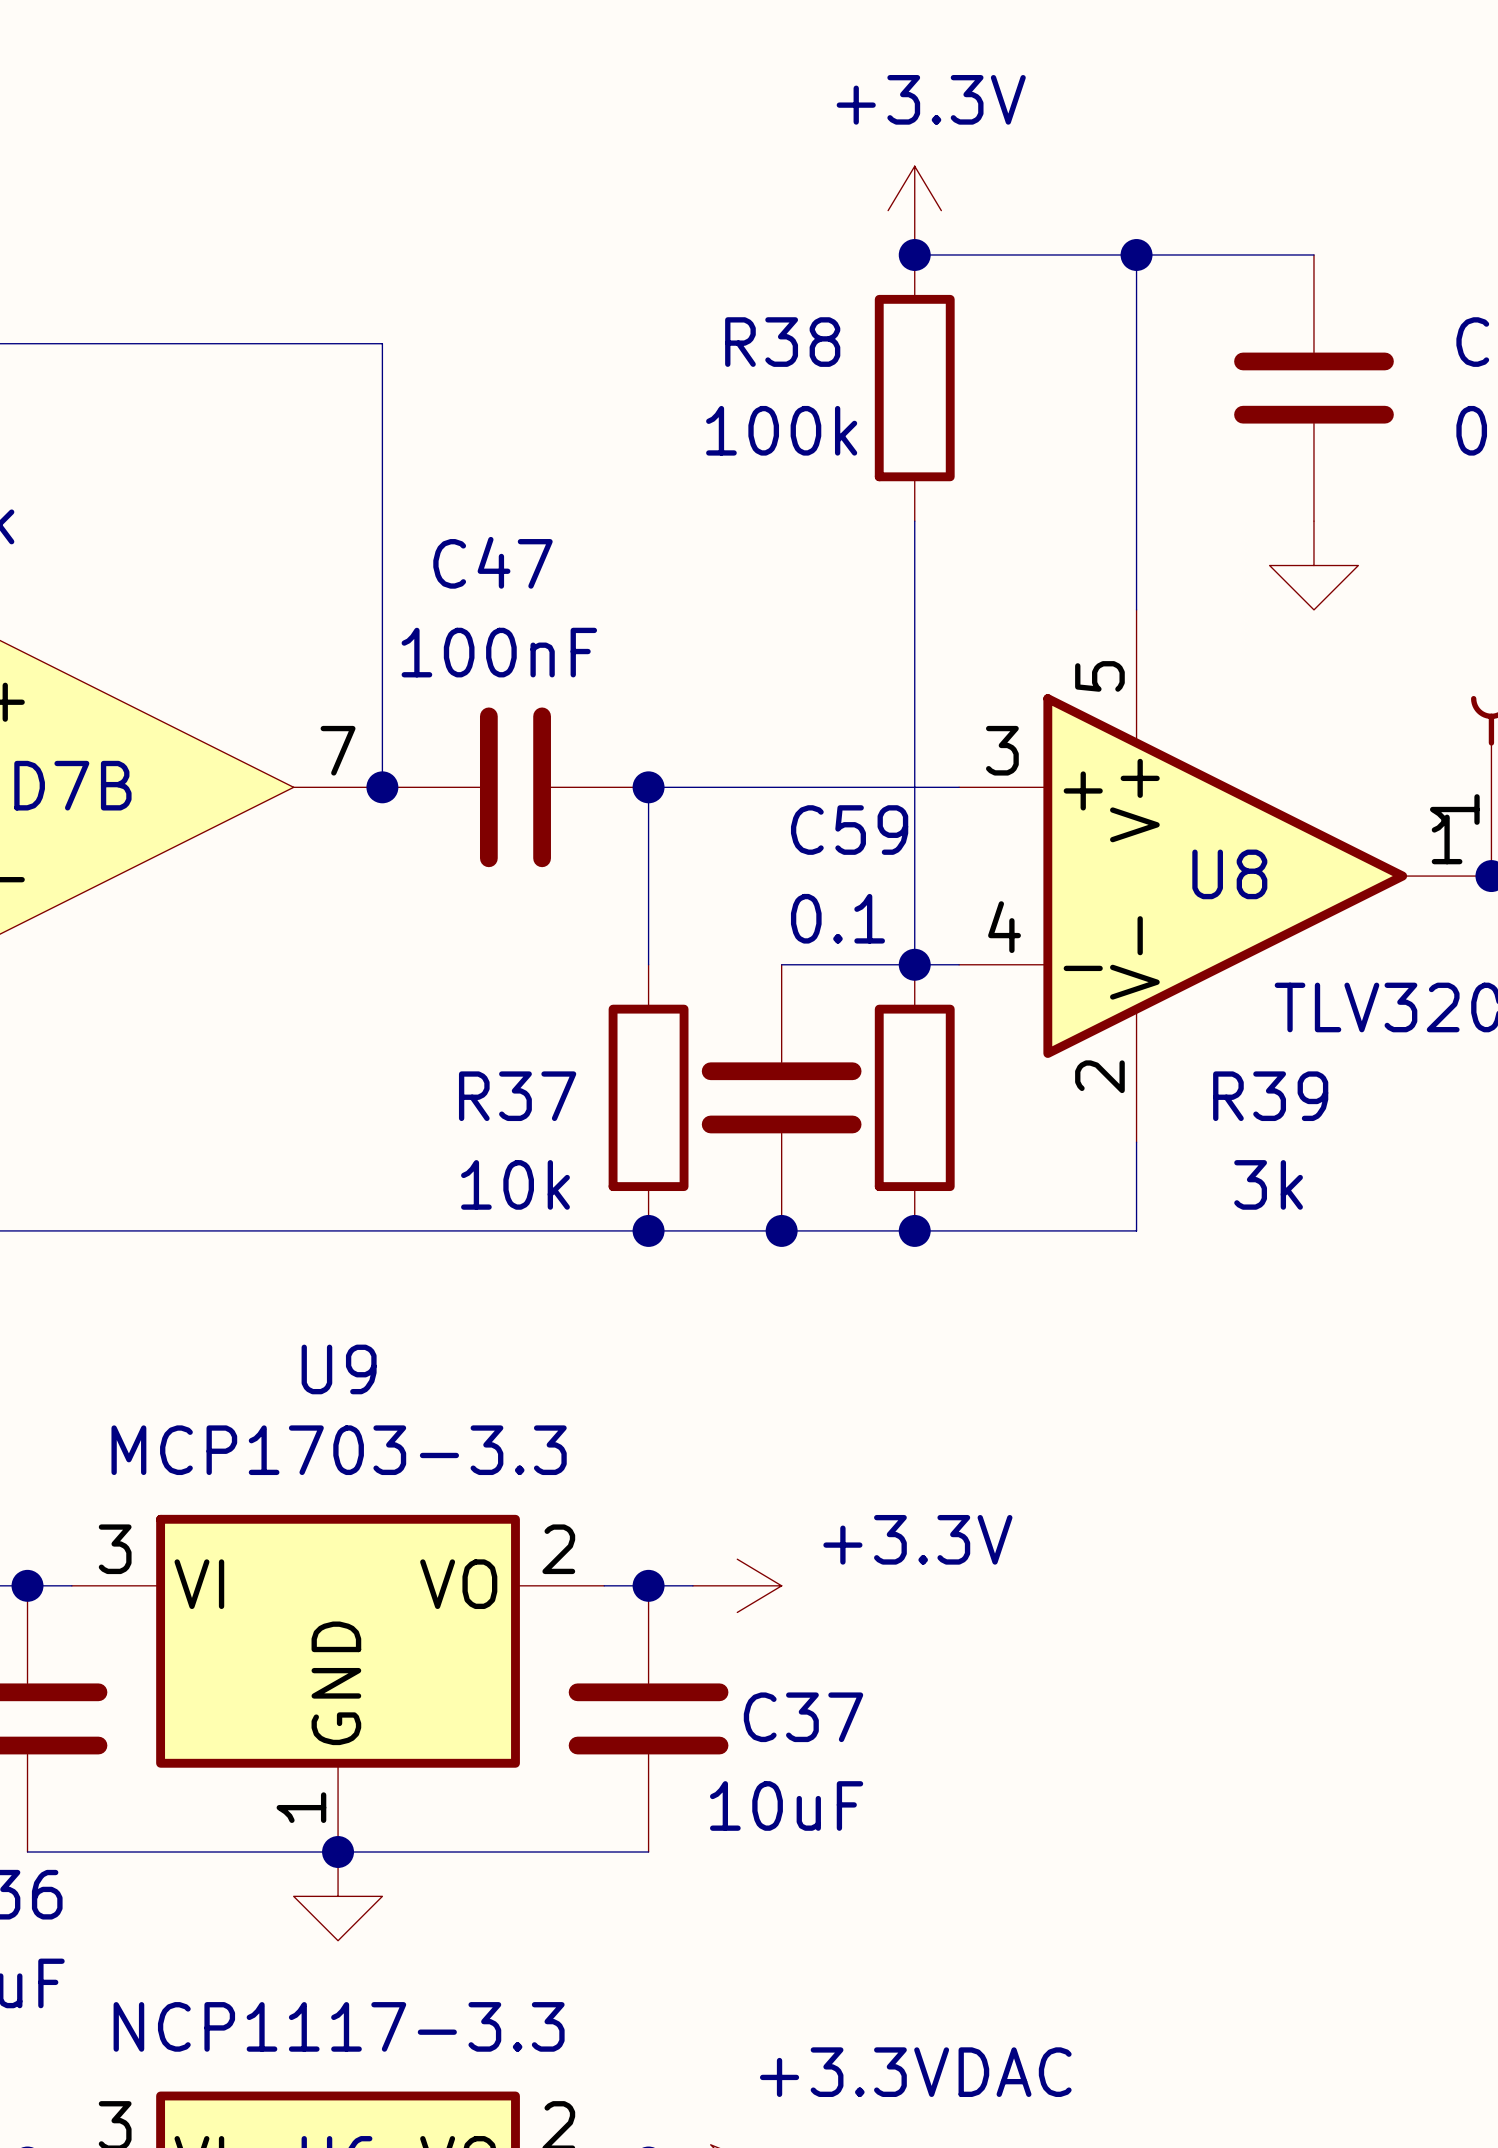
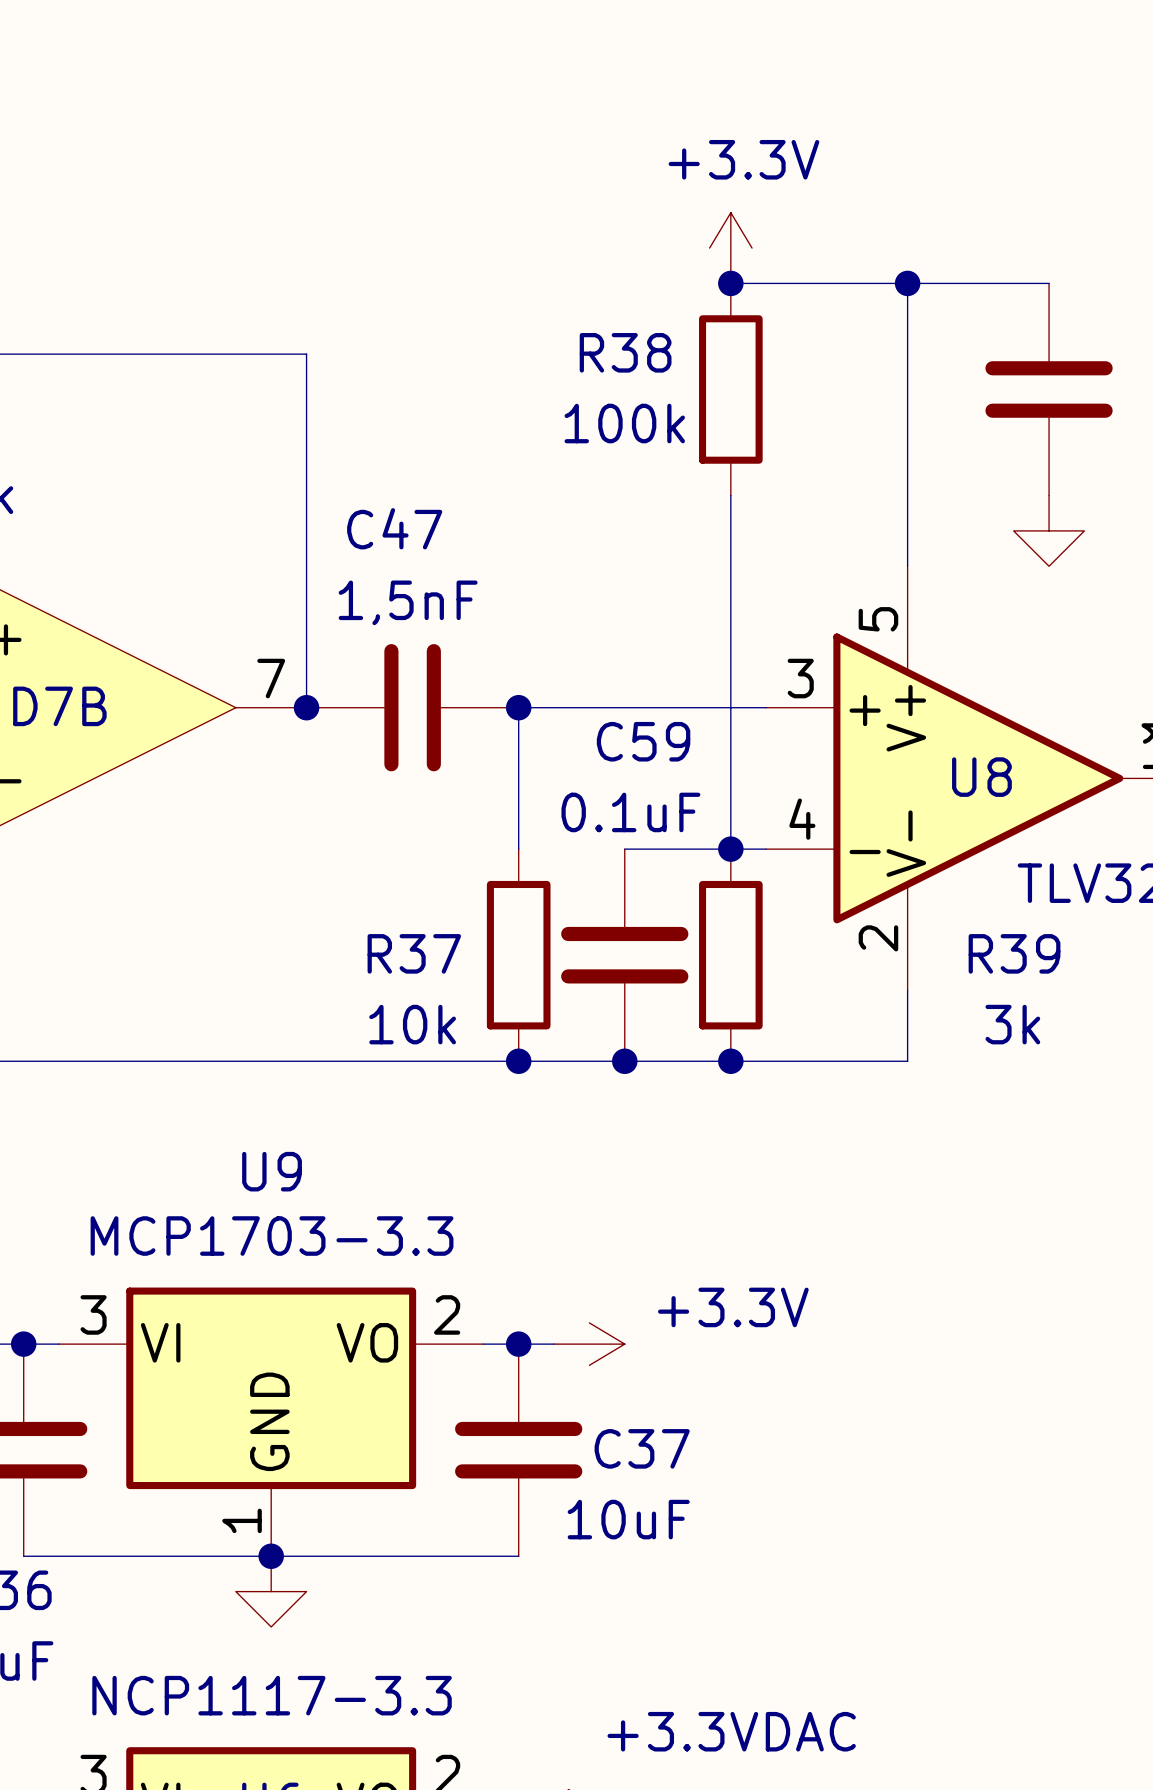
C47 value: 100nF (499, 652) -> 1,5nF (408, 602)
C59 name position: C59 (849, 830) -> C59 (643, 741)
C59 value: 0.1 (837, 918) -> 0.1uF (630, 812)

